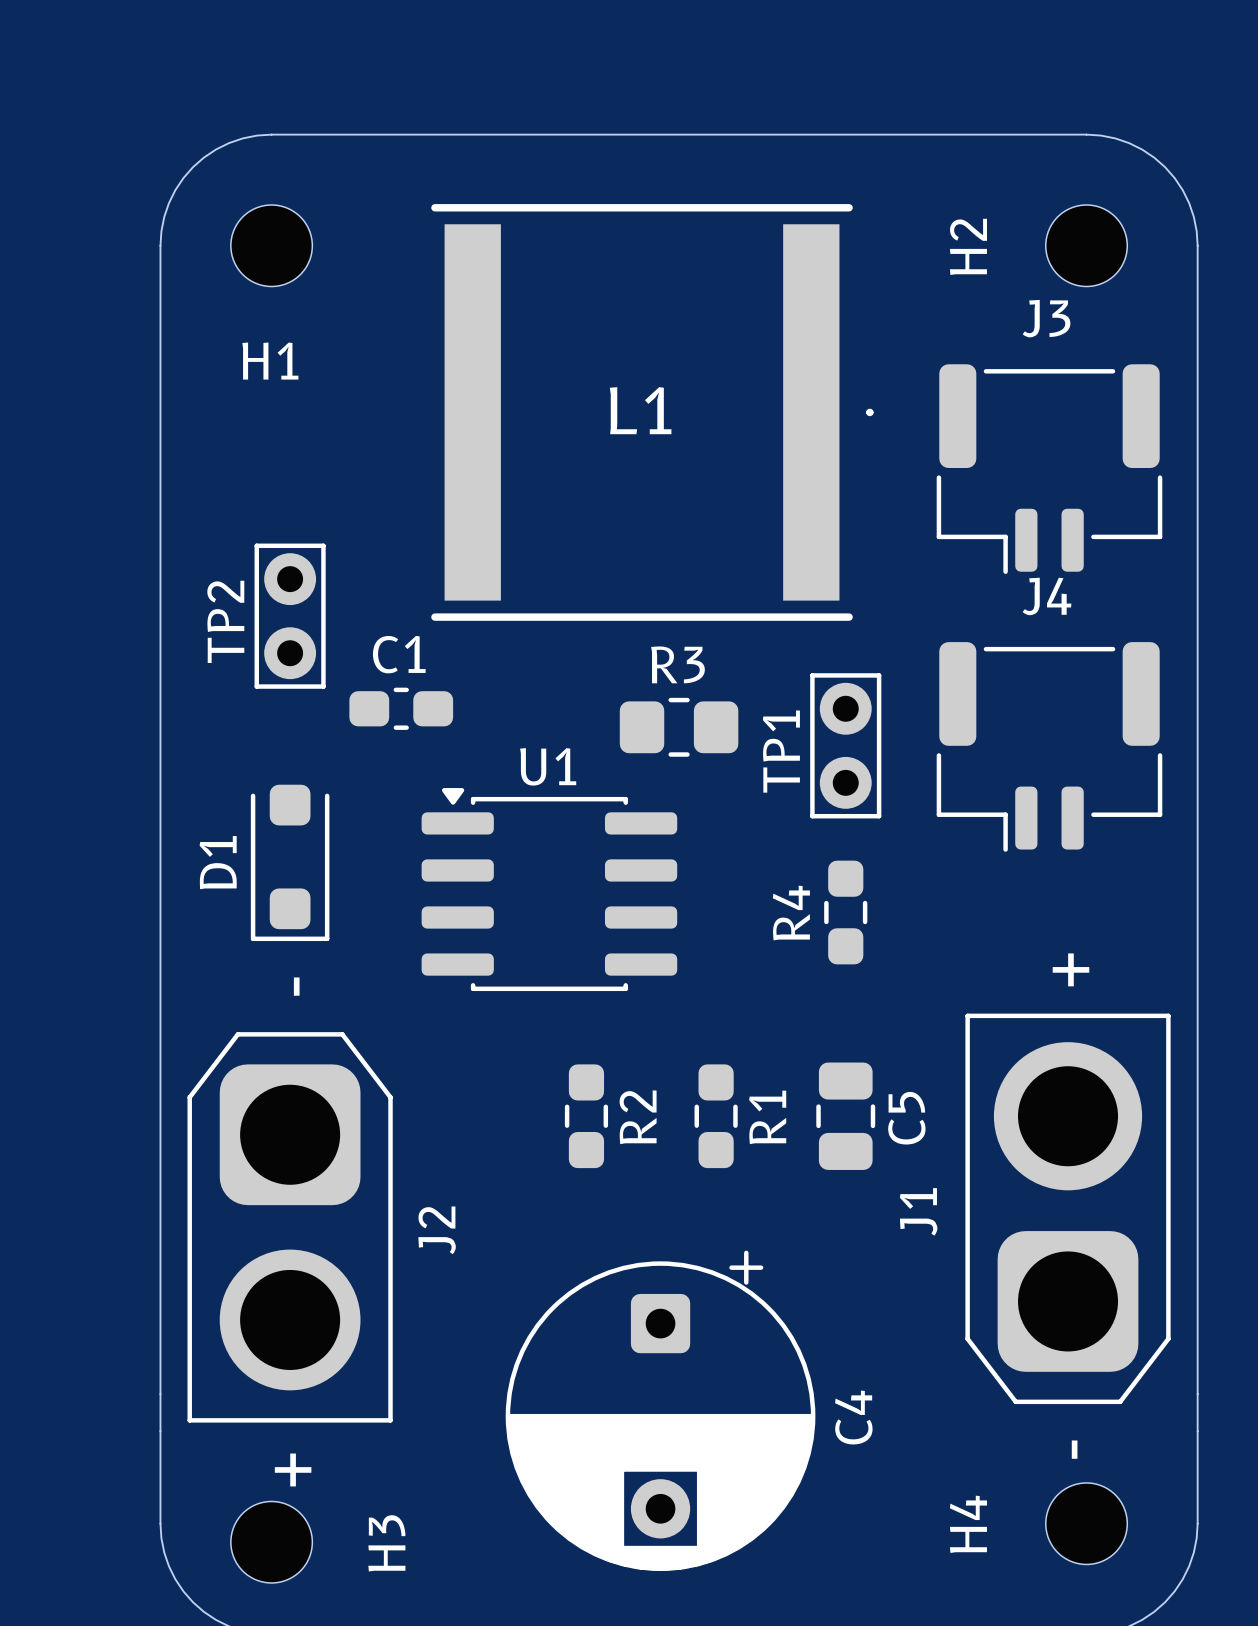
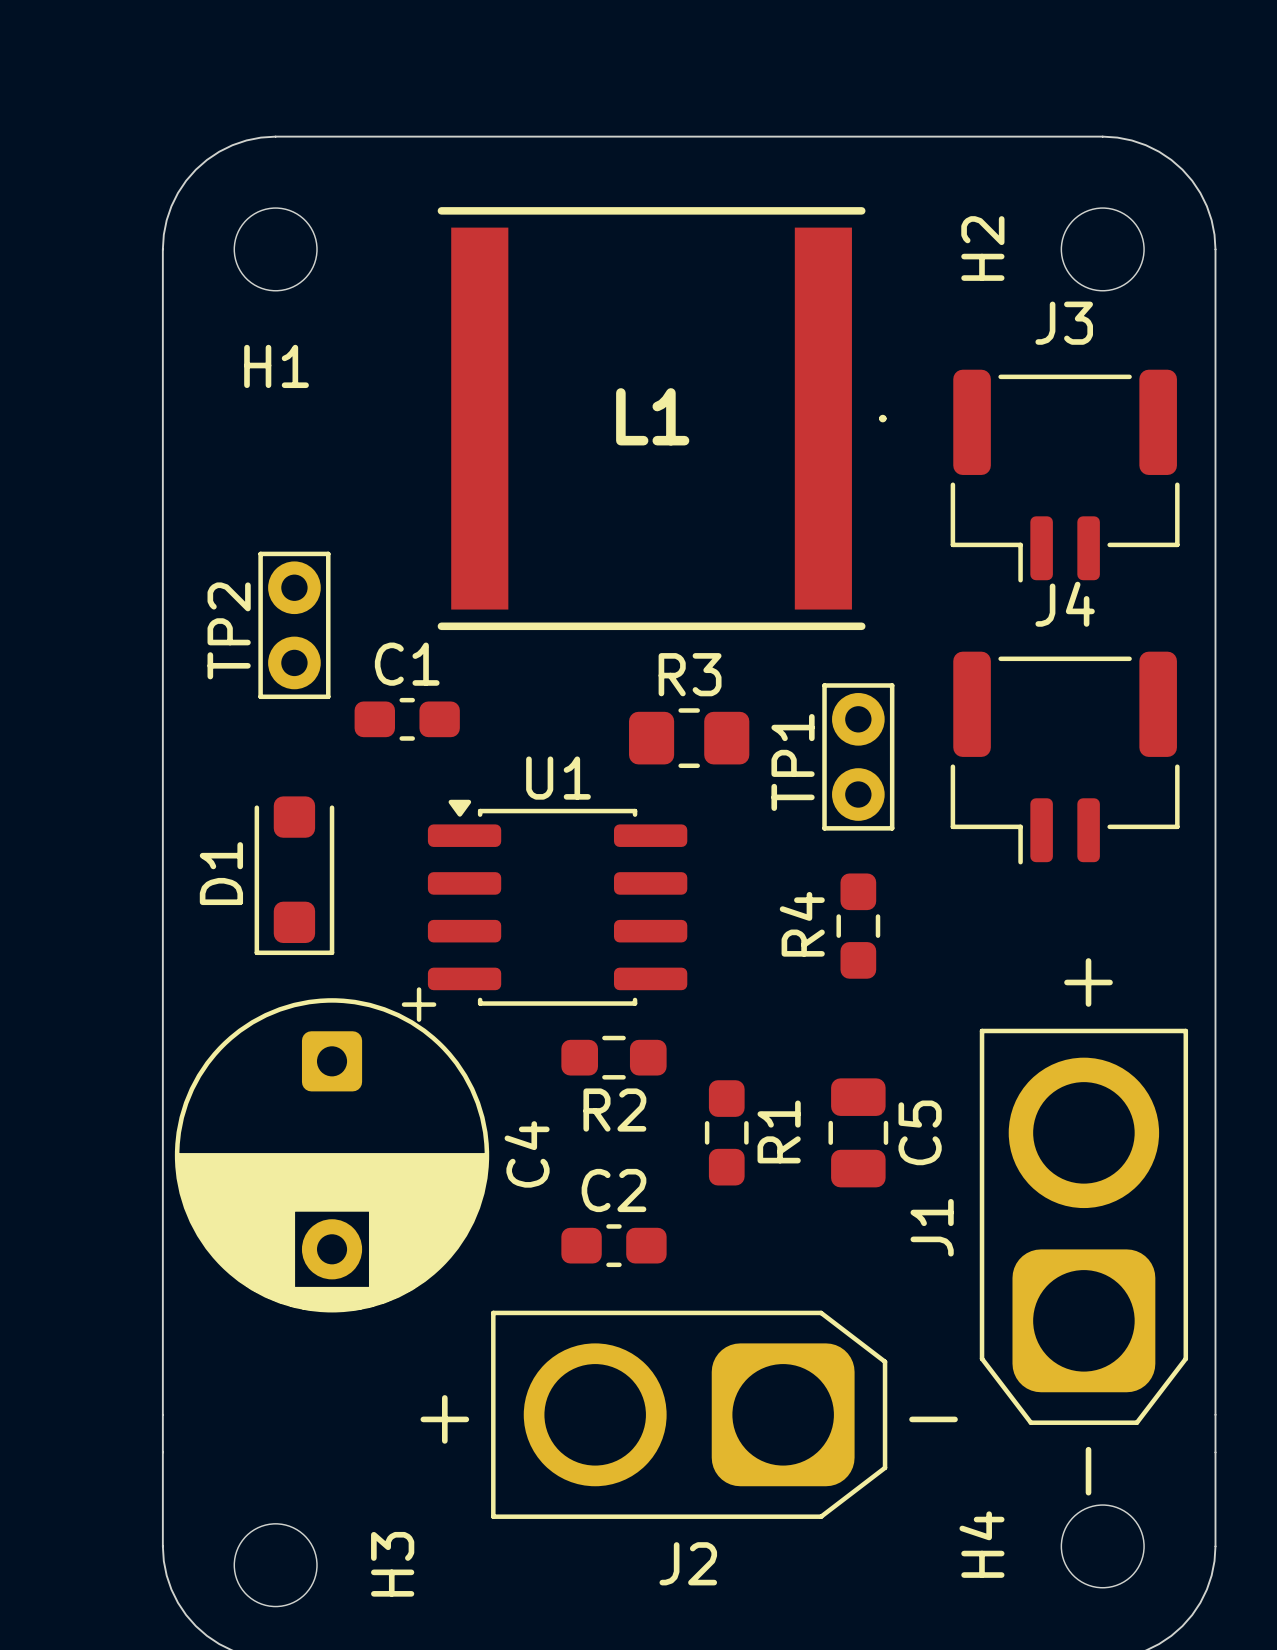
R2 rotation: 0° (586, 1116) -> 90° clockwise (613, 1057)
R2 position: (586, 1116) -> (613, 1057)
J2 rotation: 0° (290, 1227) -> 90° clockwise (689, 1414)
J2 position: (290, 1227) -> (689, 1414)
C2: none -> (613, 1245)
C4 position: (660, 1410) -> (332, 1149)

